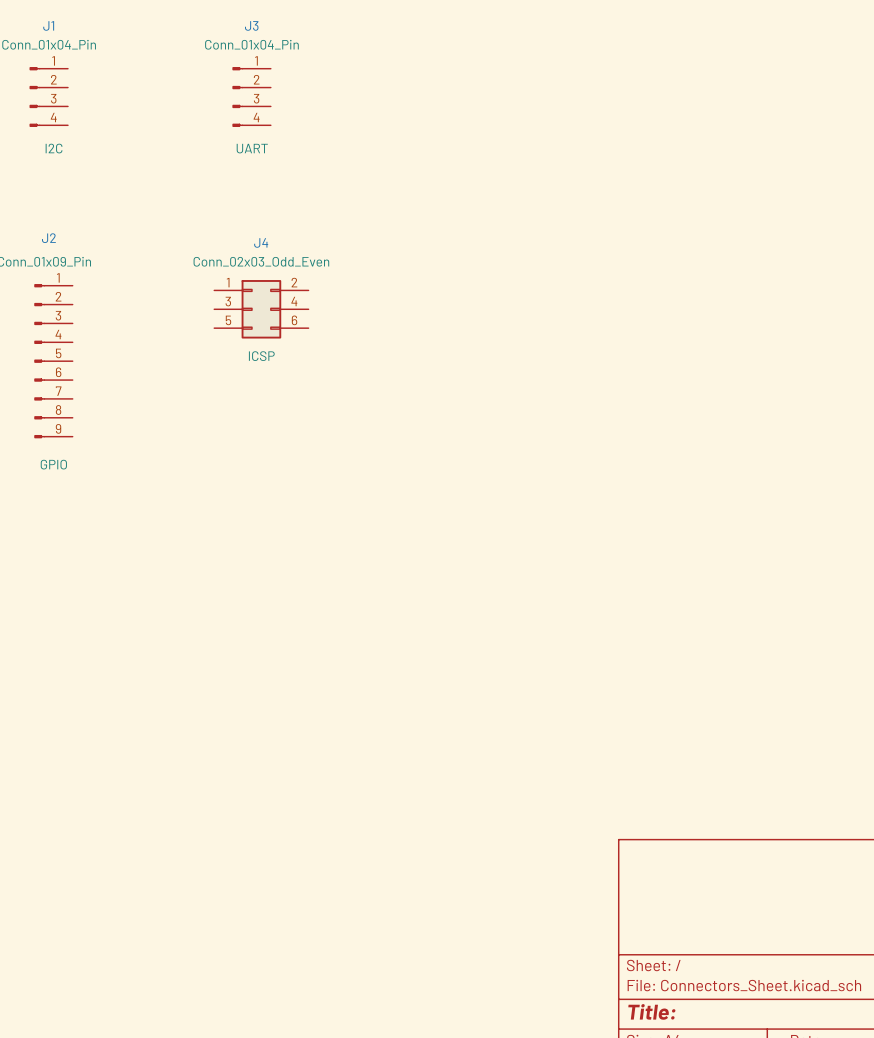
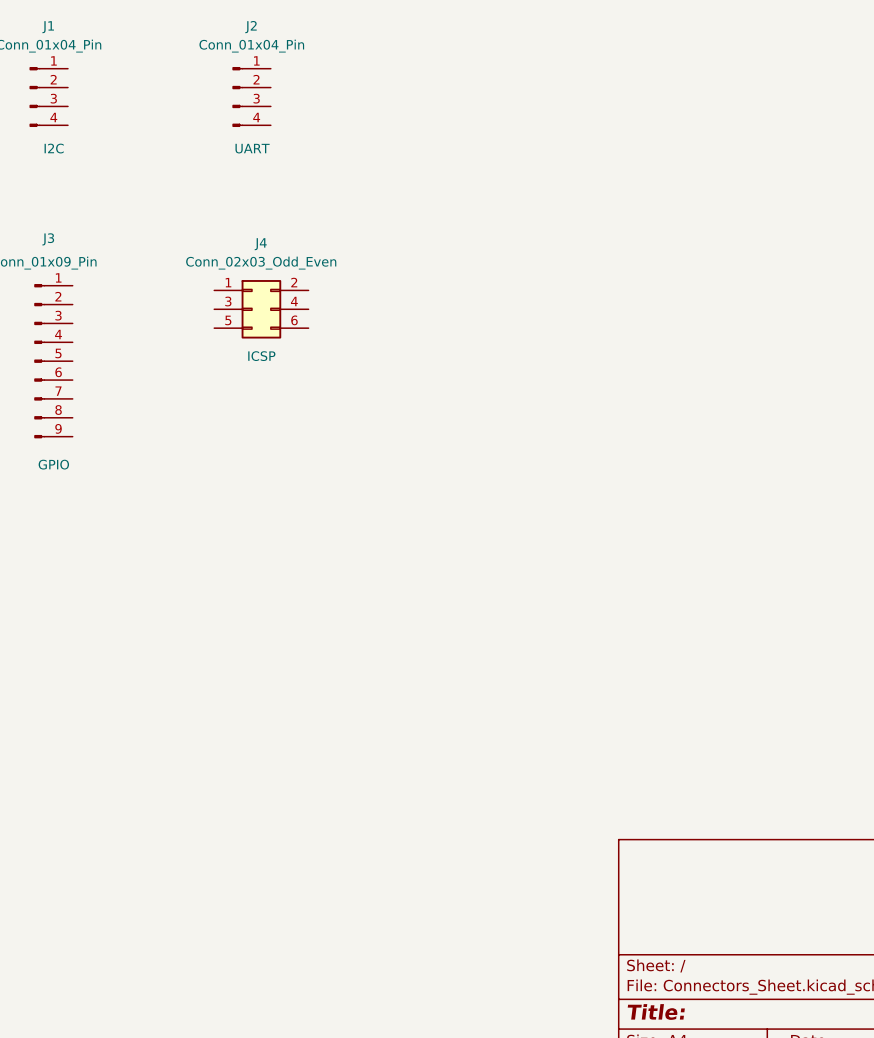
J3 name: J3 (251, 25) -> J2 (250, 27)
J2 name: J2 (48, 238) -> J3 (48, 239)

